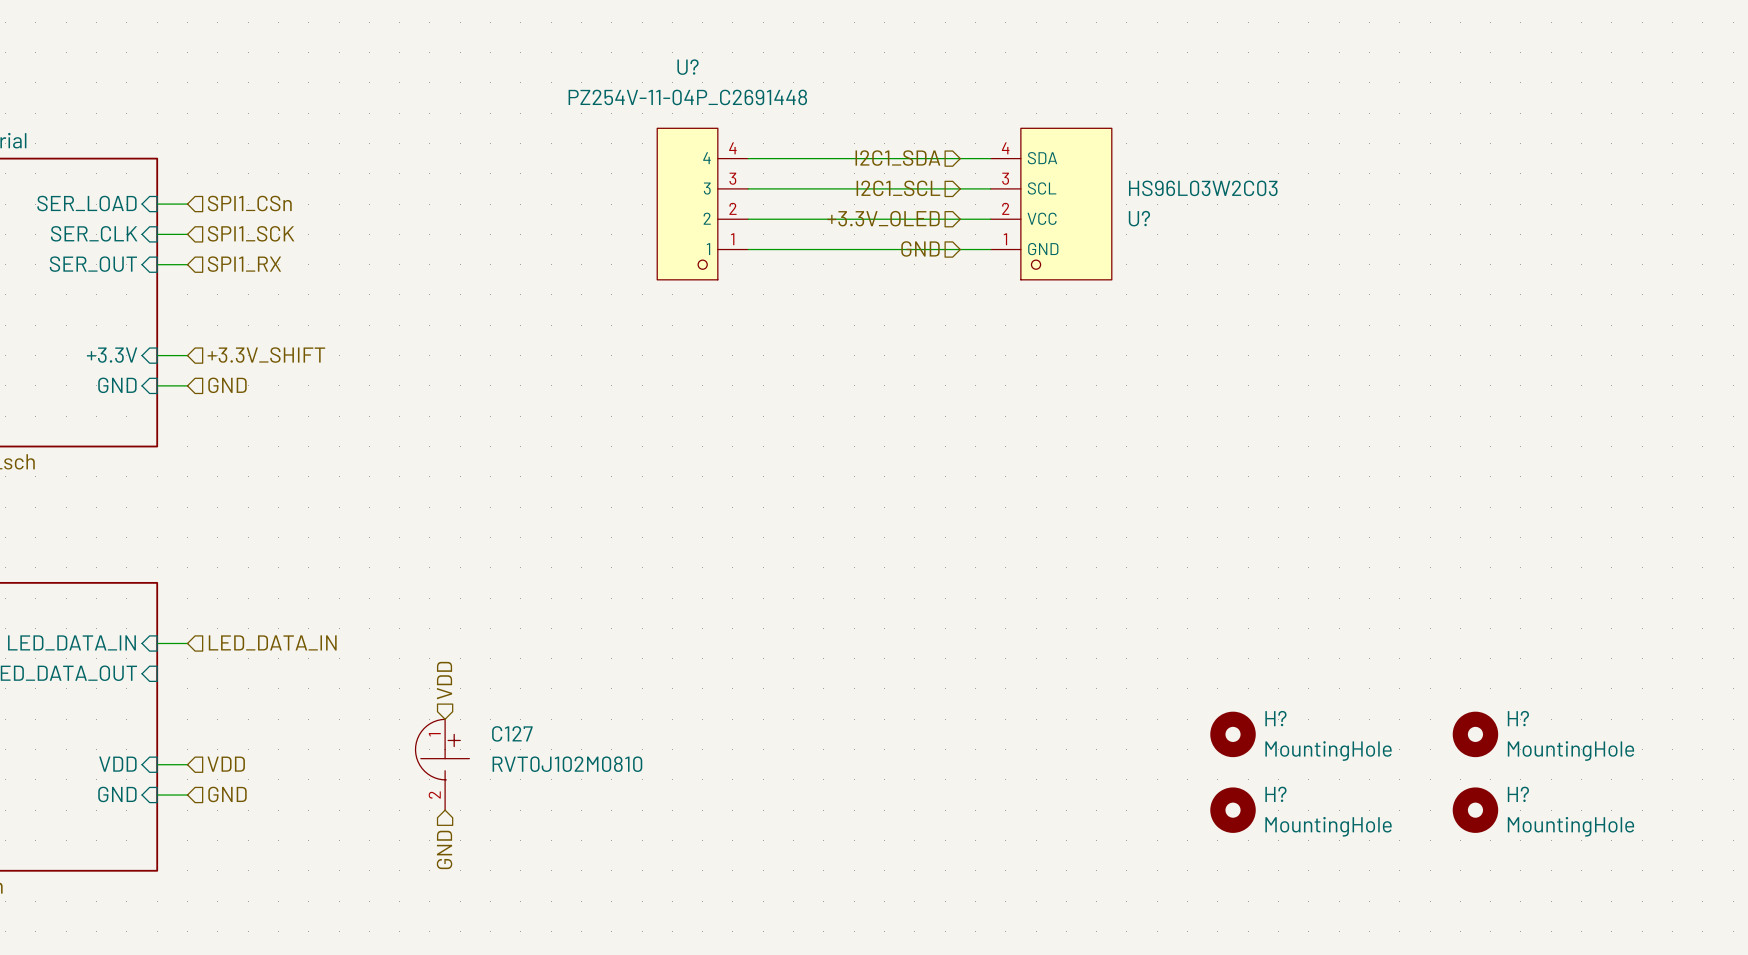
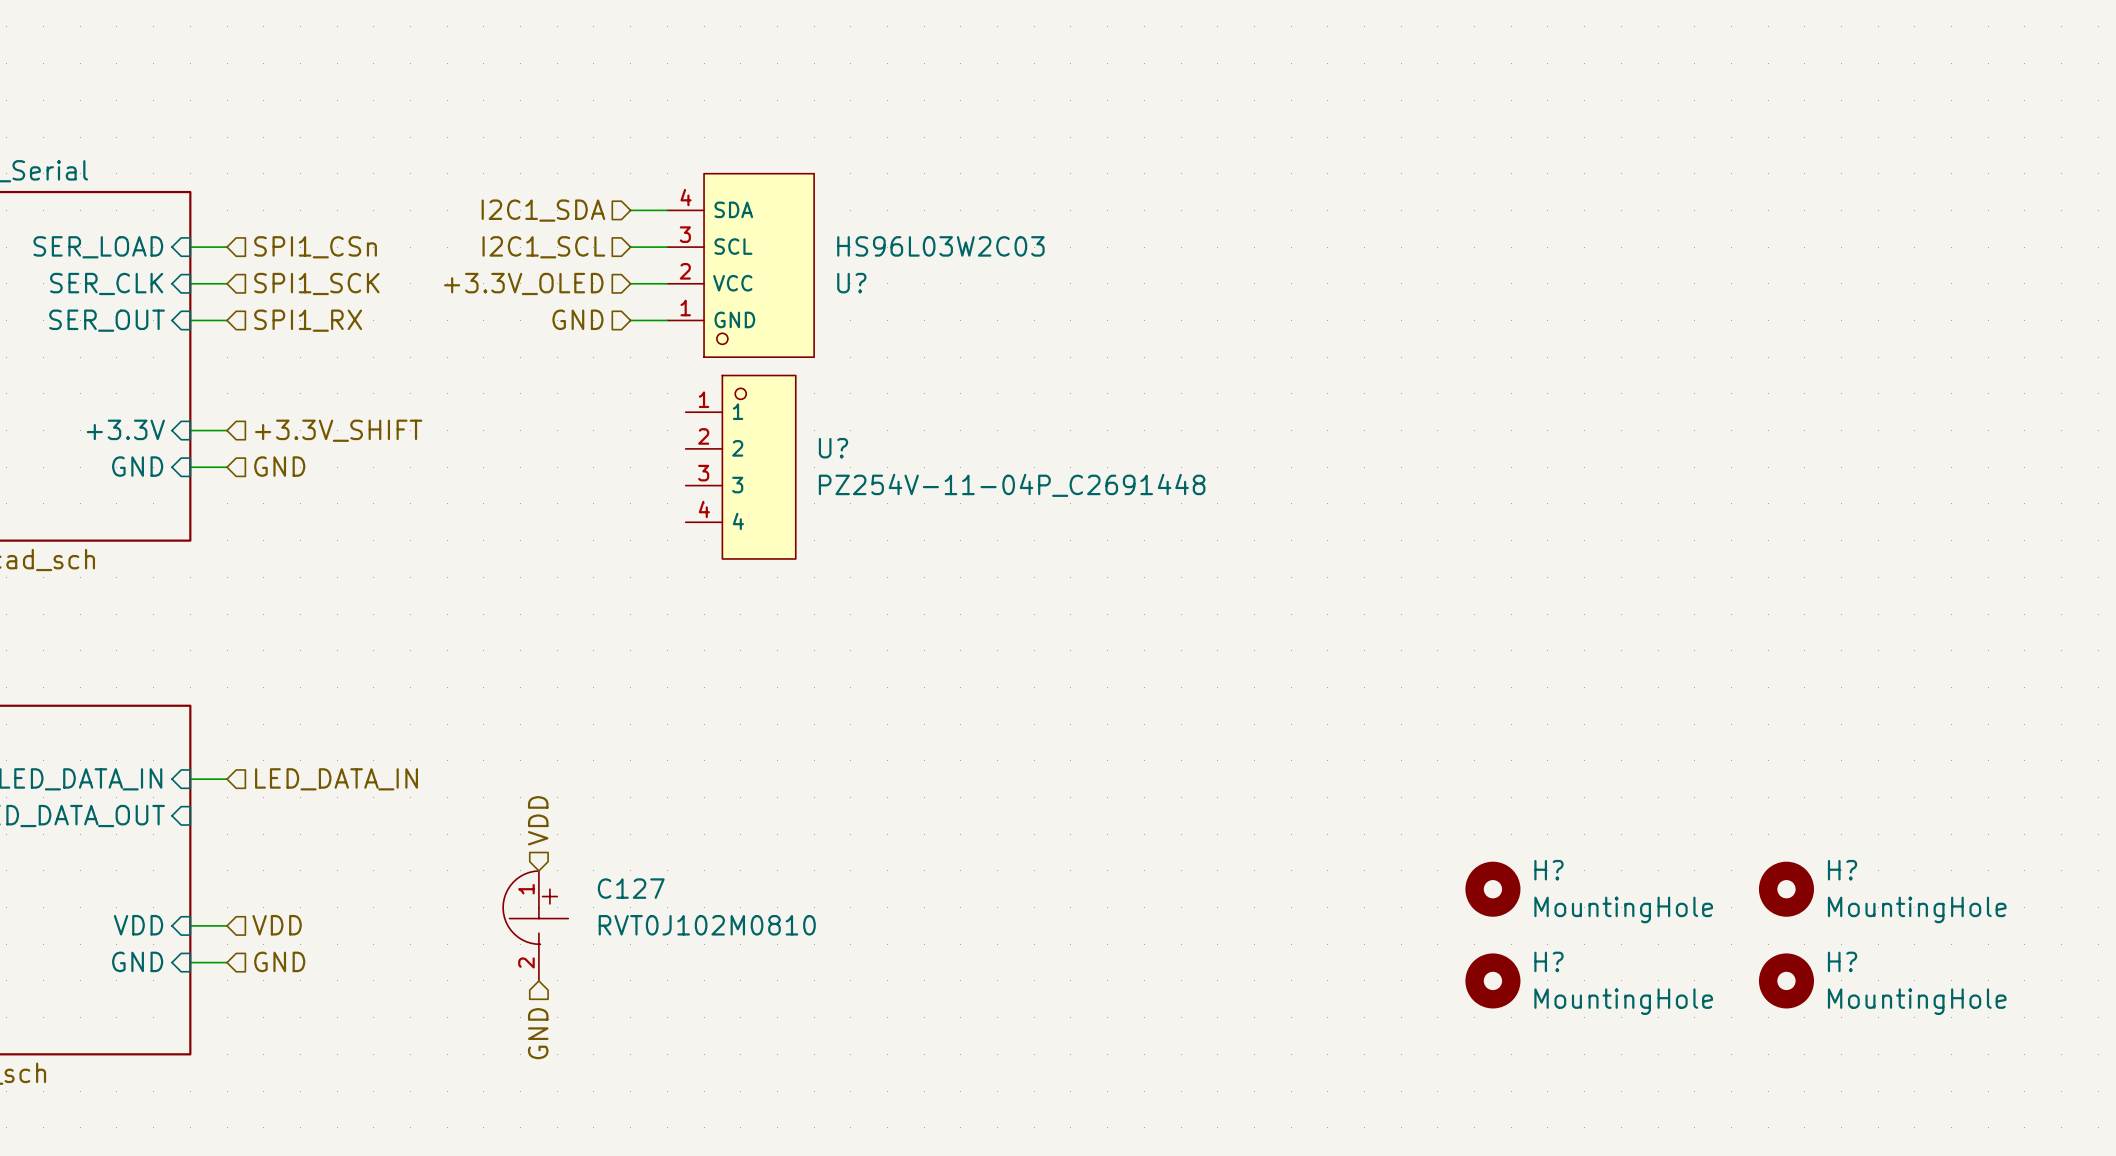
U? name position: U? (687, 67) -> U? (833, 448)
U? value position: PZ254V-11-04P_C2691448 (687, 97) -> PZ254V-11-04P_C2691448 (1012, 485)
wire: (748, 158) (990, 158) -> none
hierarchical label: I2C1_SDA (897, 158) -> none
hierarchical label: none -> I2C1_SDA (543, 210)
wire: none -> (630, 210) (667, 210)
wire: (748, 188) (990, 188) -> none
hierarchical label: I2C1_SCL (898, 188) -> none
hierarchical label: none -> I2C1_SCL (543, 247)
wire: none -> (630, 247) (667, 247)
U? rotation: 0° (687, 204) -> 180° (759, 467)
U? position: (702, 204) -> (740, 467)
U?: HS96L03W2C03 (1051, 204) -> none
hierarchical label: +3.3V_OLED (883, 218) -> none
U?: none -> HS96L03W2C03 (740, 265)
wire: (748, 219) (990, 219) -> none
hierarchical label: none -> +3.3V_OLED (523, 283)
wire: none -> (630, 283) (667, 283)
hierarchical label: GND (920, 248) -> none
wire: (748, 249) (990, 249) -> none
hierarchical label: none -> GND (577, 319)
wire: none -> (630, 320) (667, 320)

